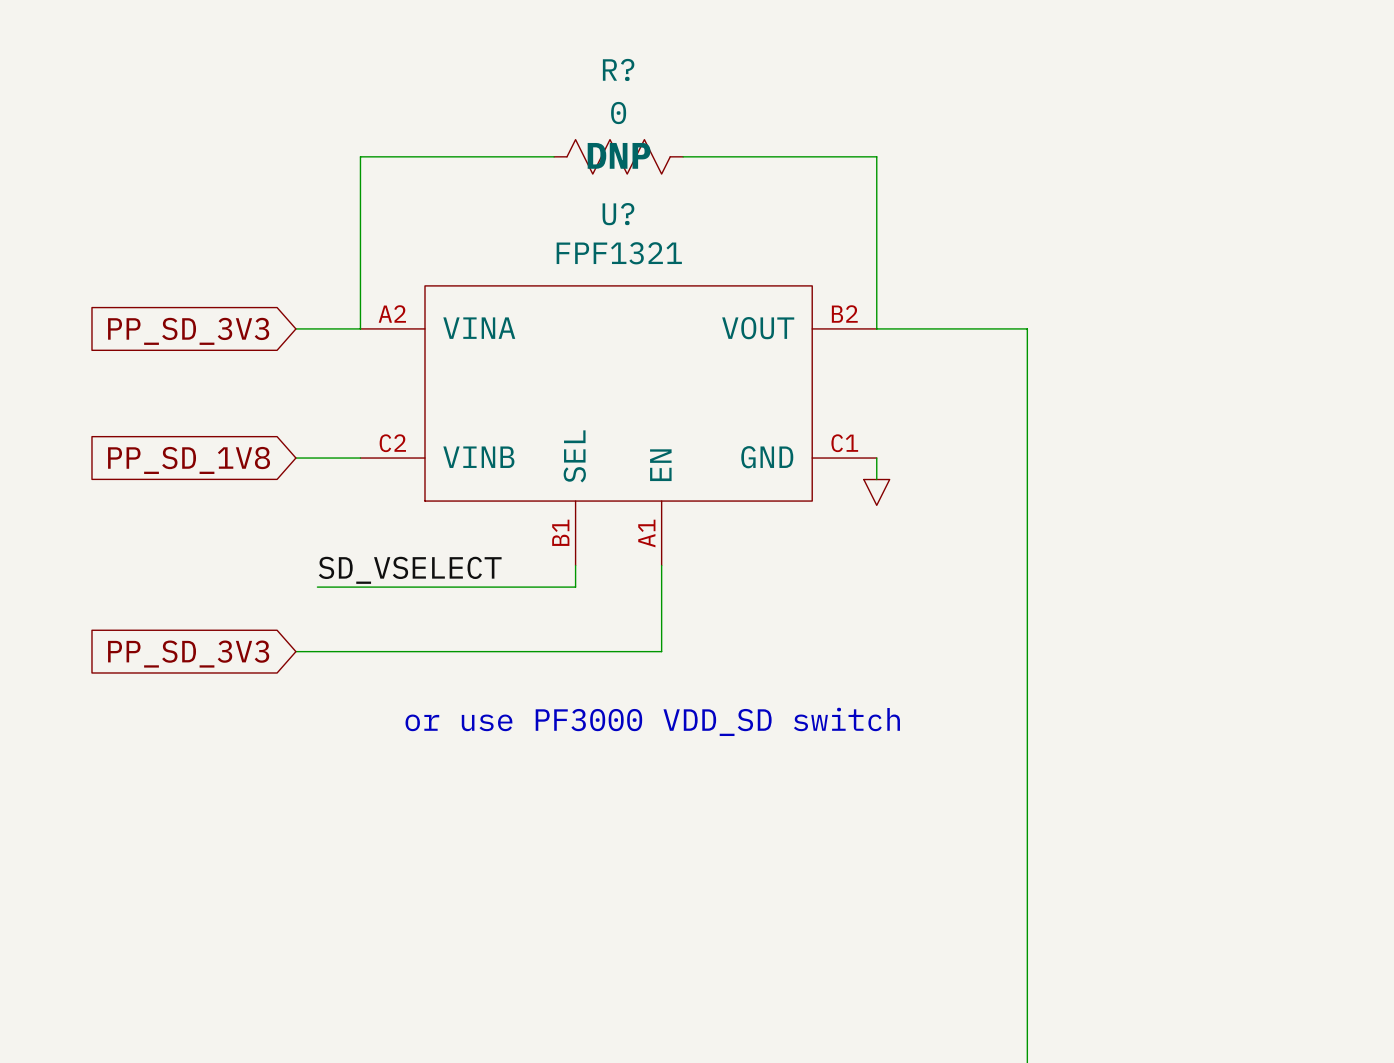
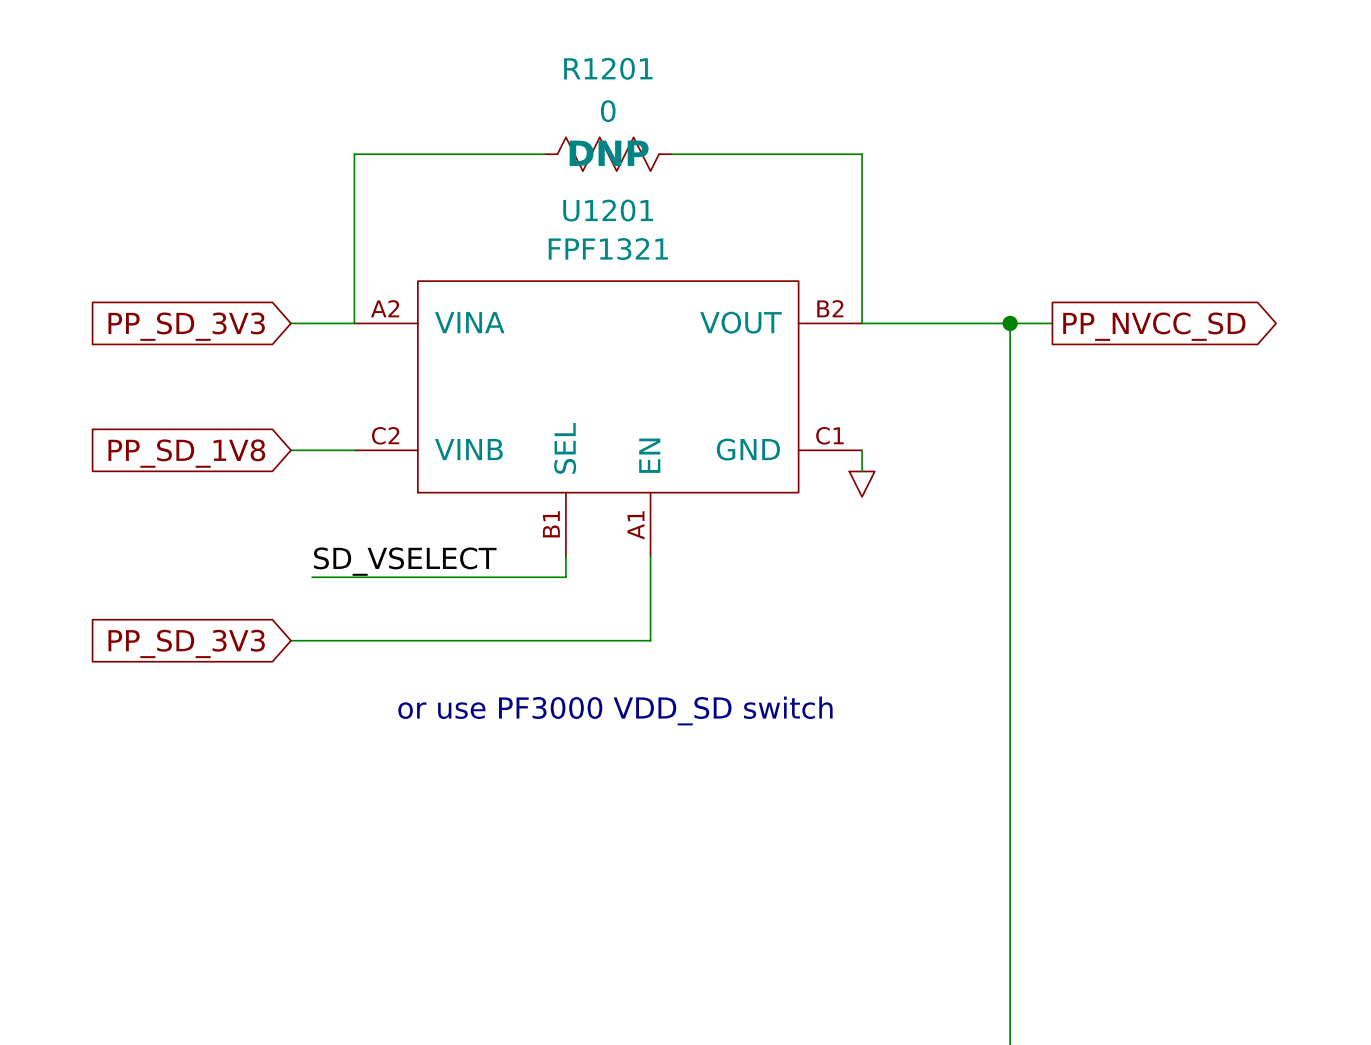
R? name: R? (618, 69) -> R1201 (608, 68)
U? name: U? (618, 214) -> U1201 (608, 210)
wire: none -> (1010, 323) (1052, 323)
junction: none -> (1010, 323)
global label: none -> PP_NVCC_SD (1154, 326)

